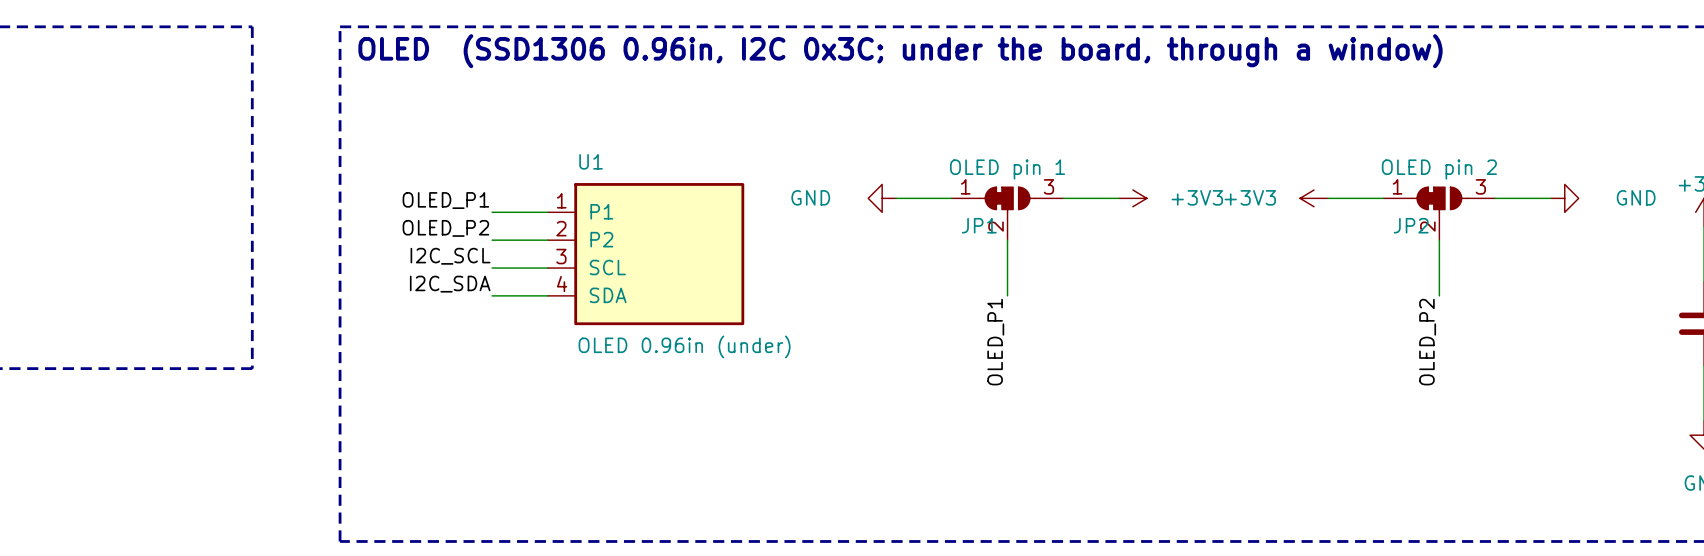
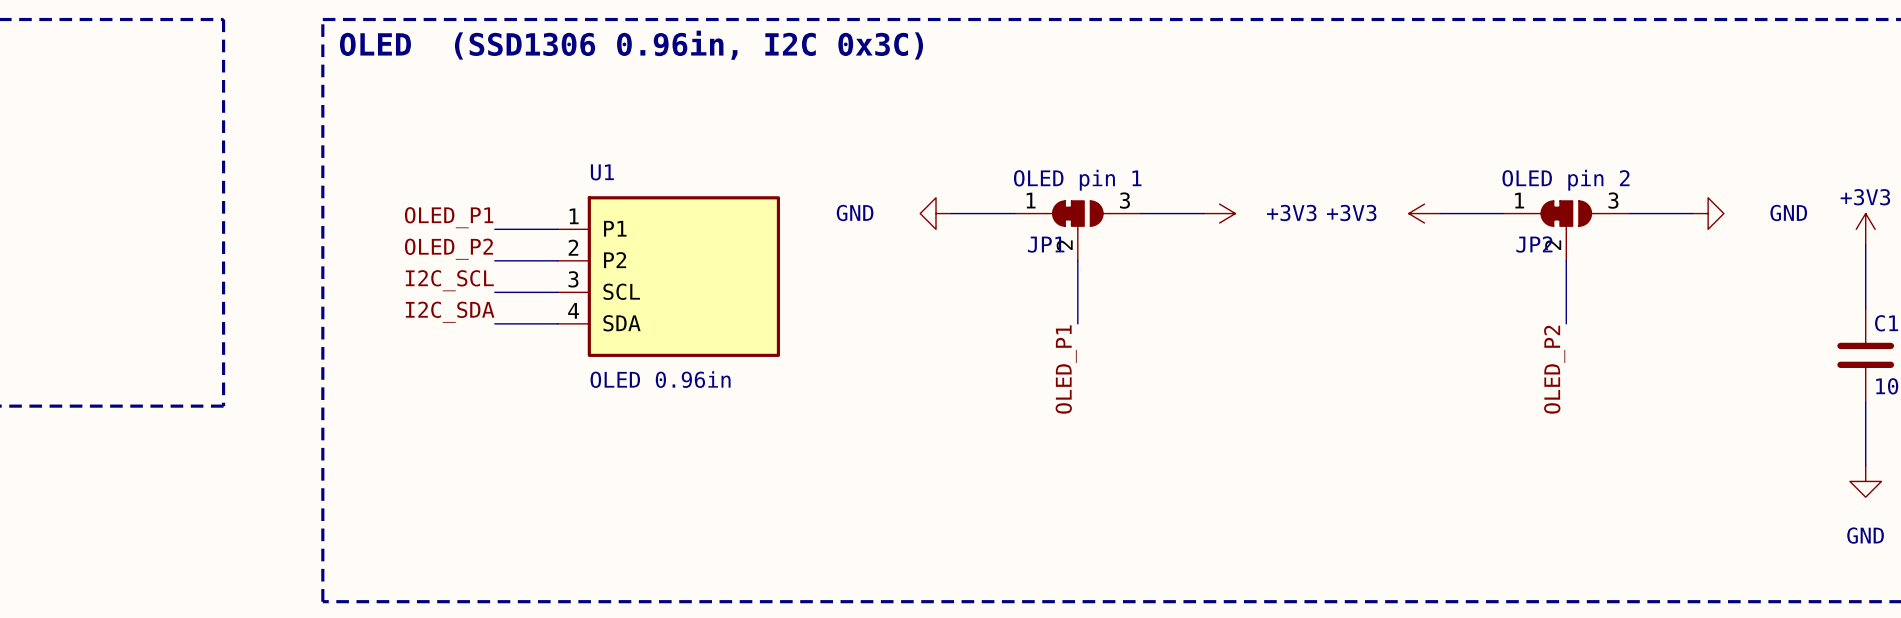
text: OLED (SSD1306 0.96in, I2C 0x3C; under the board, through a window) (900, 51) -> OLED (SSD1306 0.96in, I2C 0x3C) (631, 45)
U1 value: OLED 0.96in (under) (684, 346) -> OLED 0.96in (660, 379)

